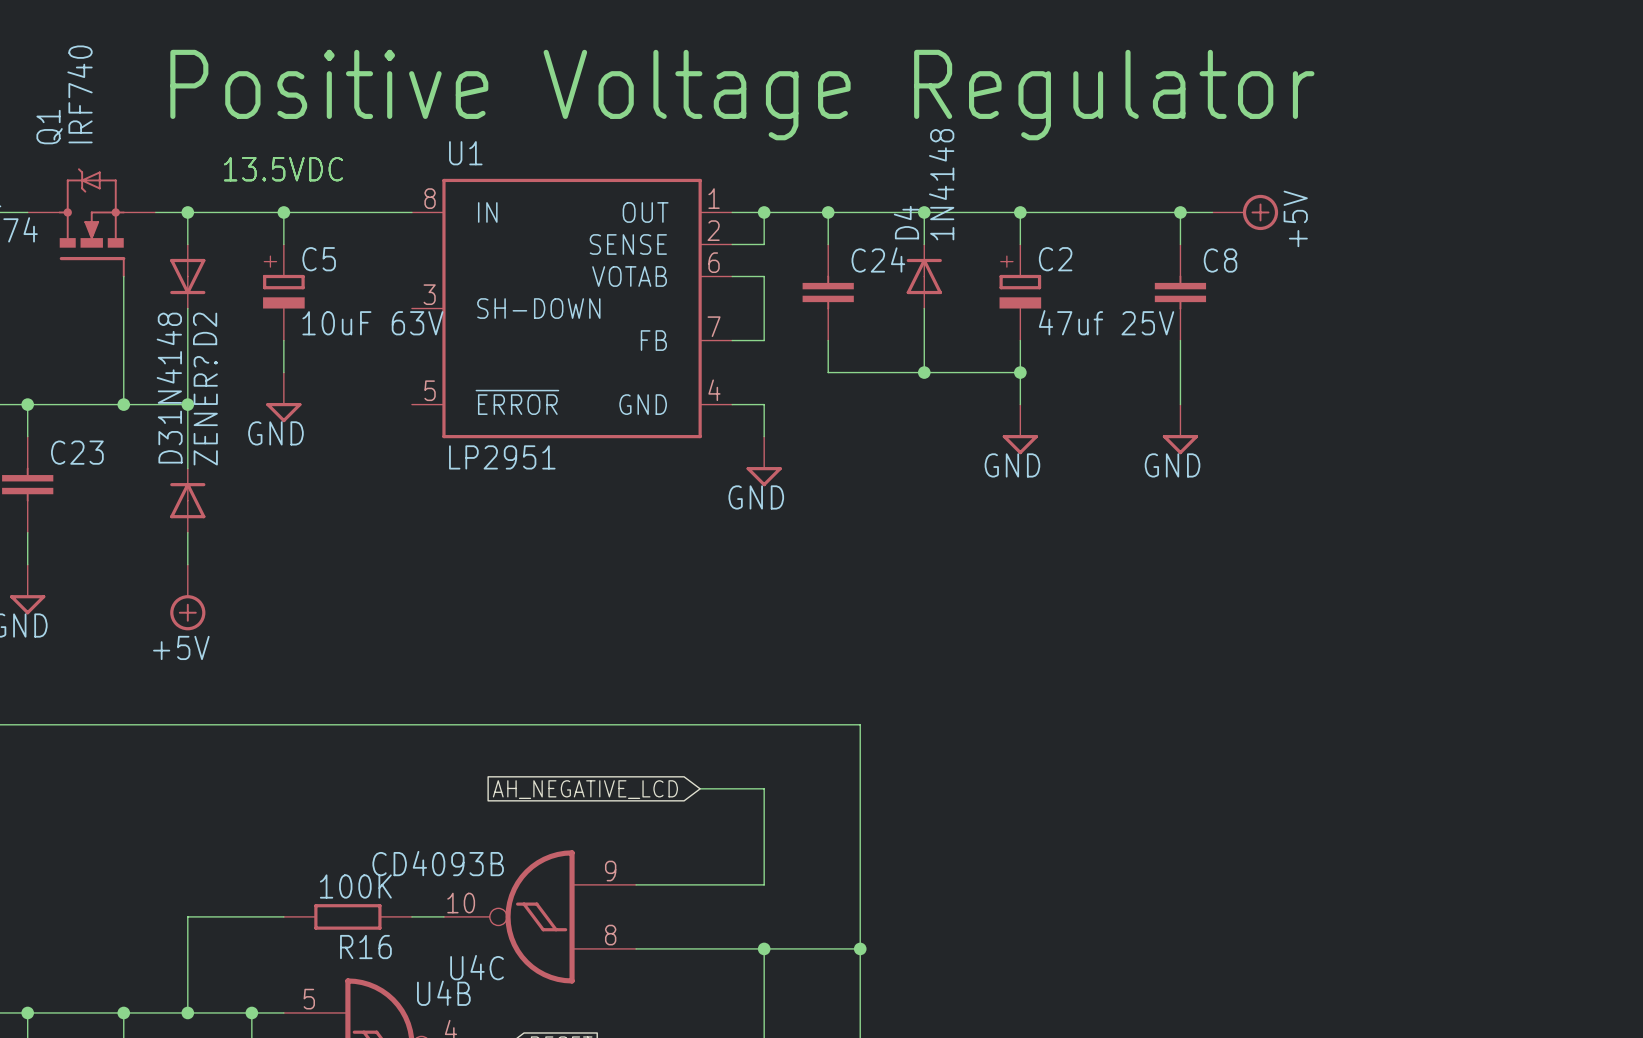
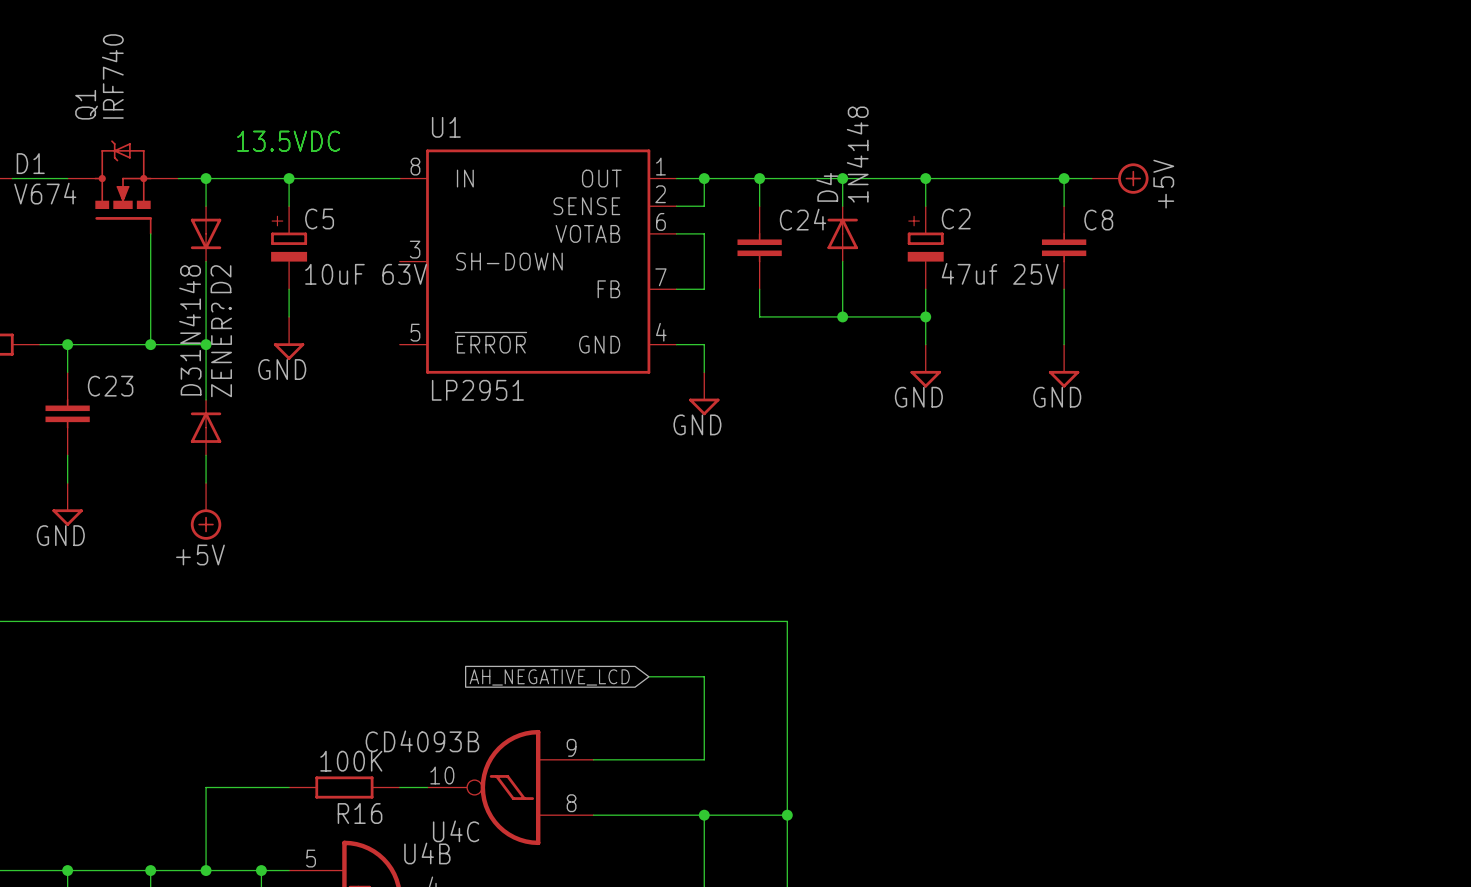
text: Positive Voltage Regulator (742, 95) -> none

